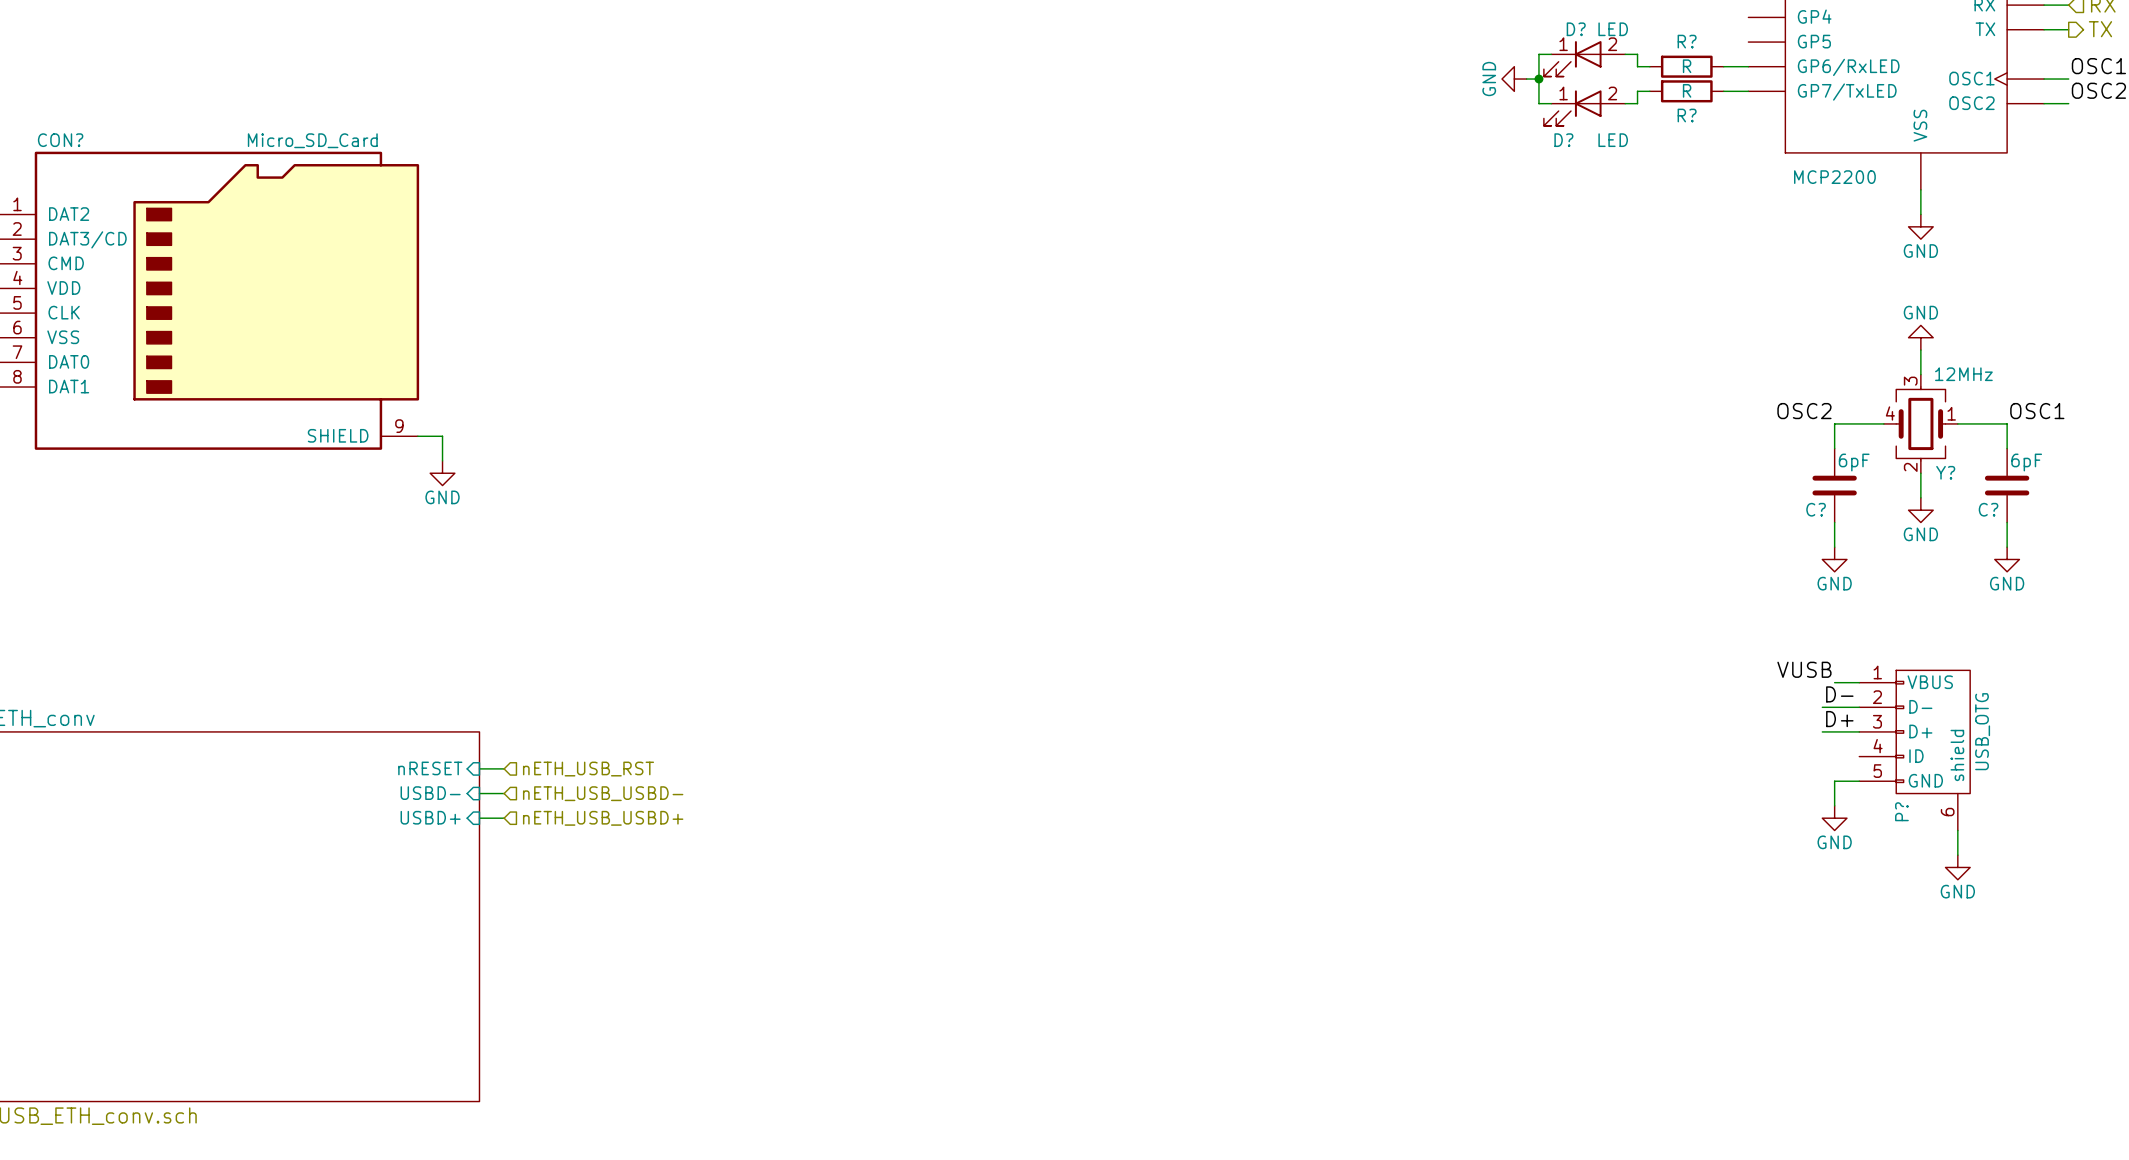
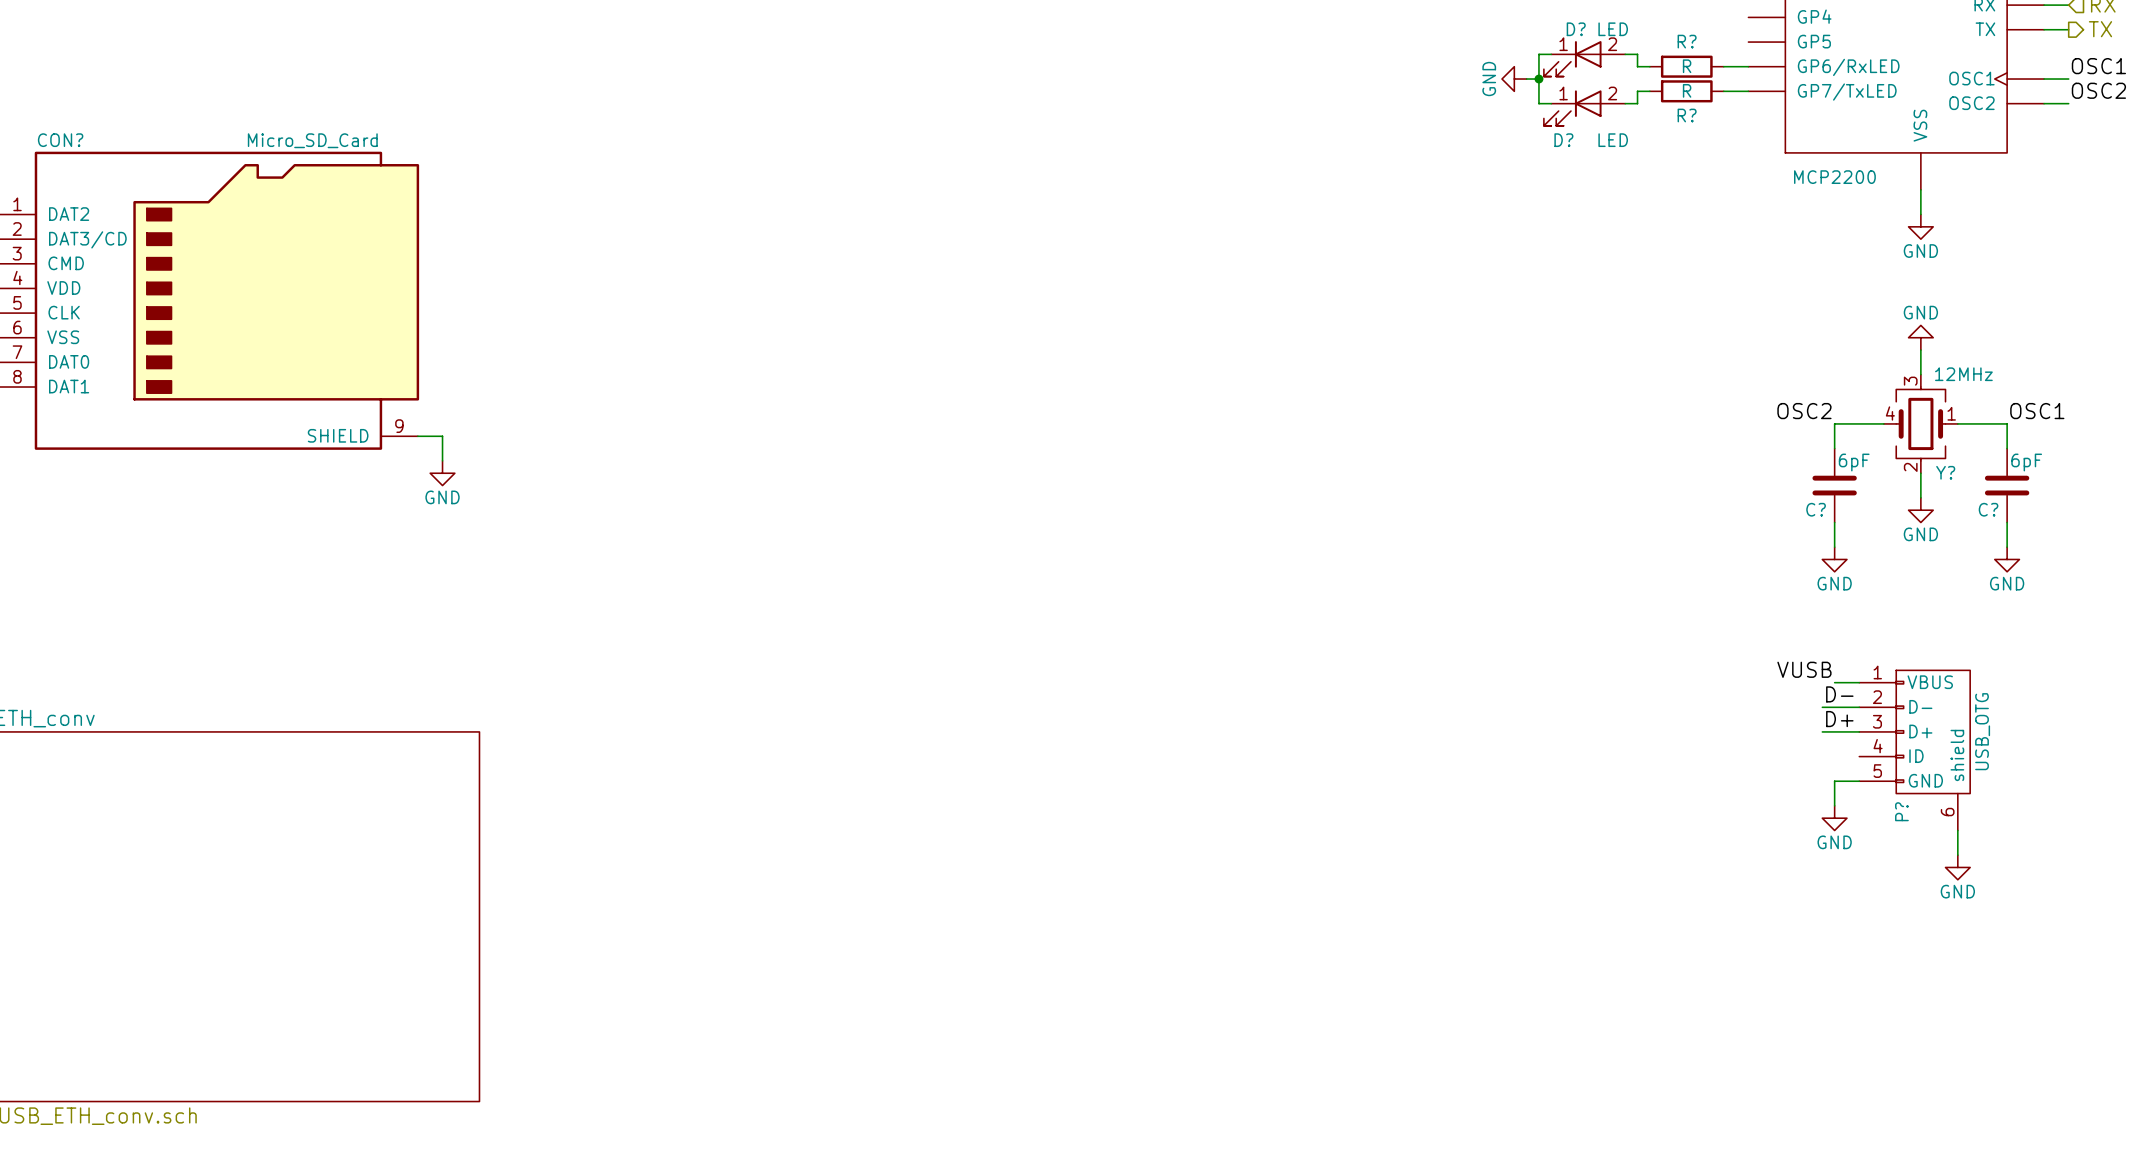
sheet pin: nRESET (430, 768) -> none
wire: (479, 768) (504, 768) -> none
hierarchical label: nETH_USB_RST (588, 769) -> none
sheet pin: USBD- (430, 793) -> none
wire: (479, 793) (504, 793) -> none
hierarchical label: nETH_USB_USBD- (603, 793) -> none
sheet pin: USBD+ (430, 817) -> none
wire: (479, 818) (504, 818) -> none
hierarchical label: nETH_USB_USBD+ (603, 818) -> none

